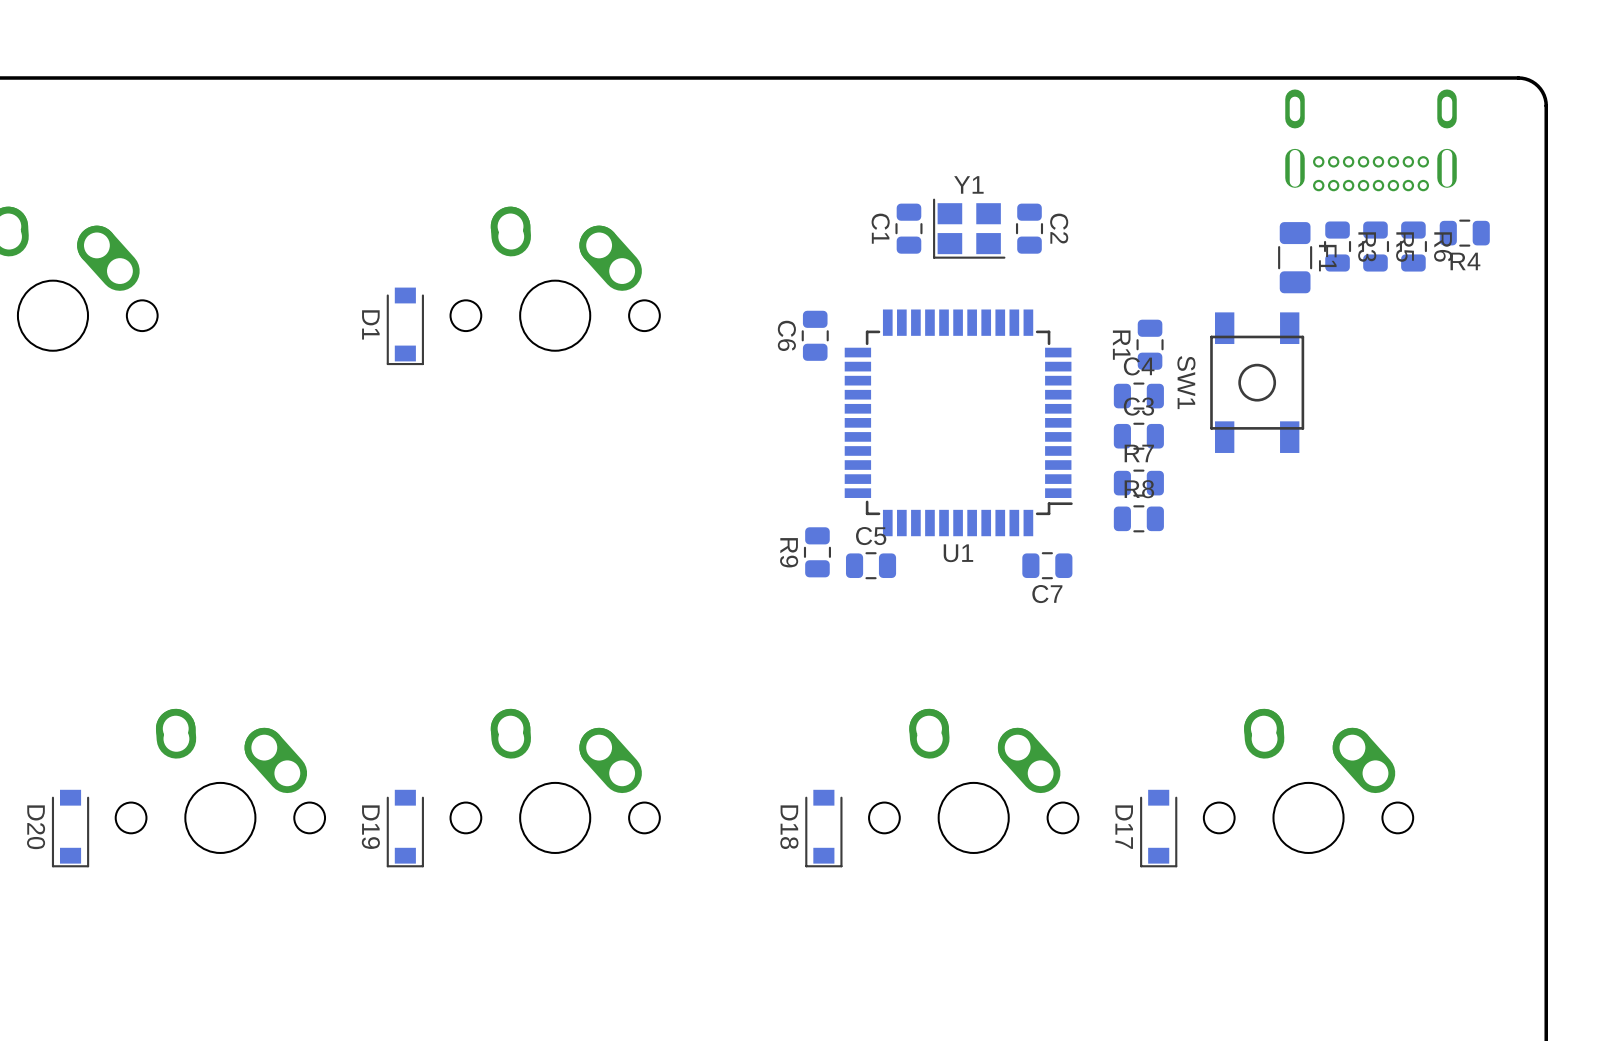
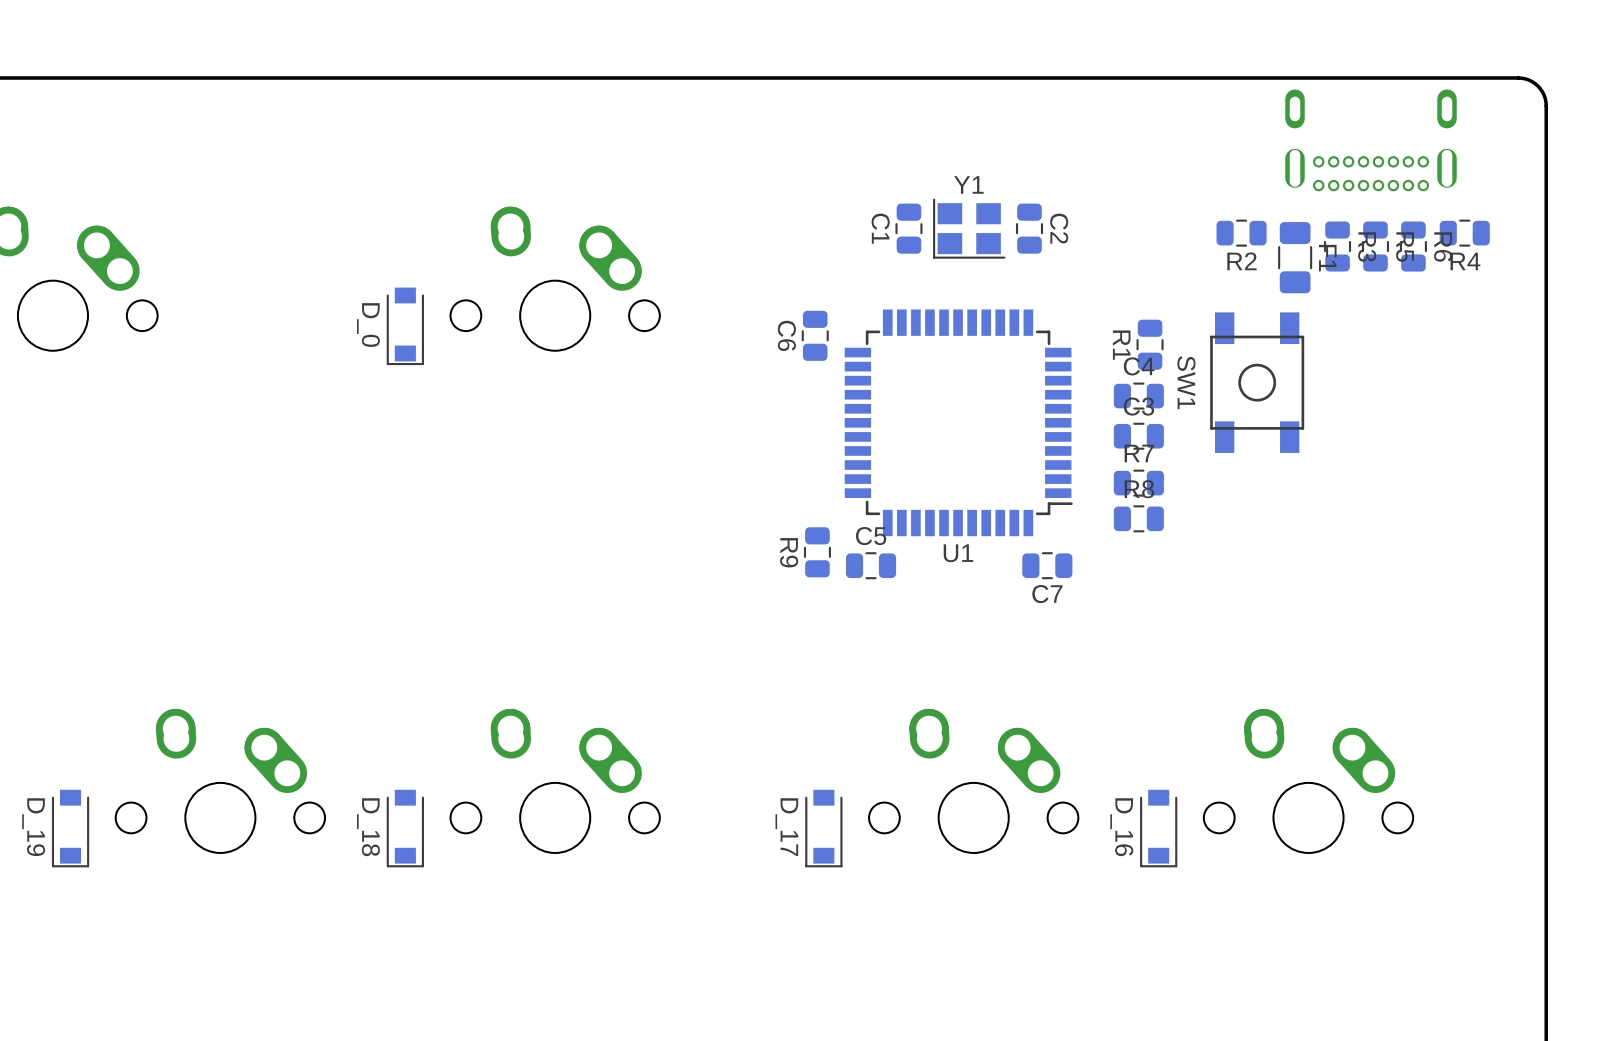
R2: none -> (1241, 233)
D1 name: D1 (370, 324) -> D_0 (368, 325)
D20 name: D20 (36, 827) -> D_19 (33, 827)
D19 name: D19 (370, 827) -> D_18 (368, 827)
D18 name: D18 (789, 827) -> D_17 (786, 827)
D17 name: D17 (1124, 827) -> D_16 (1121, 827)

